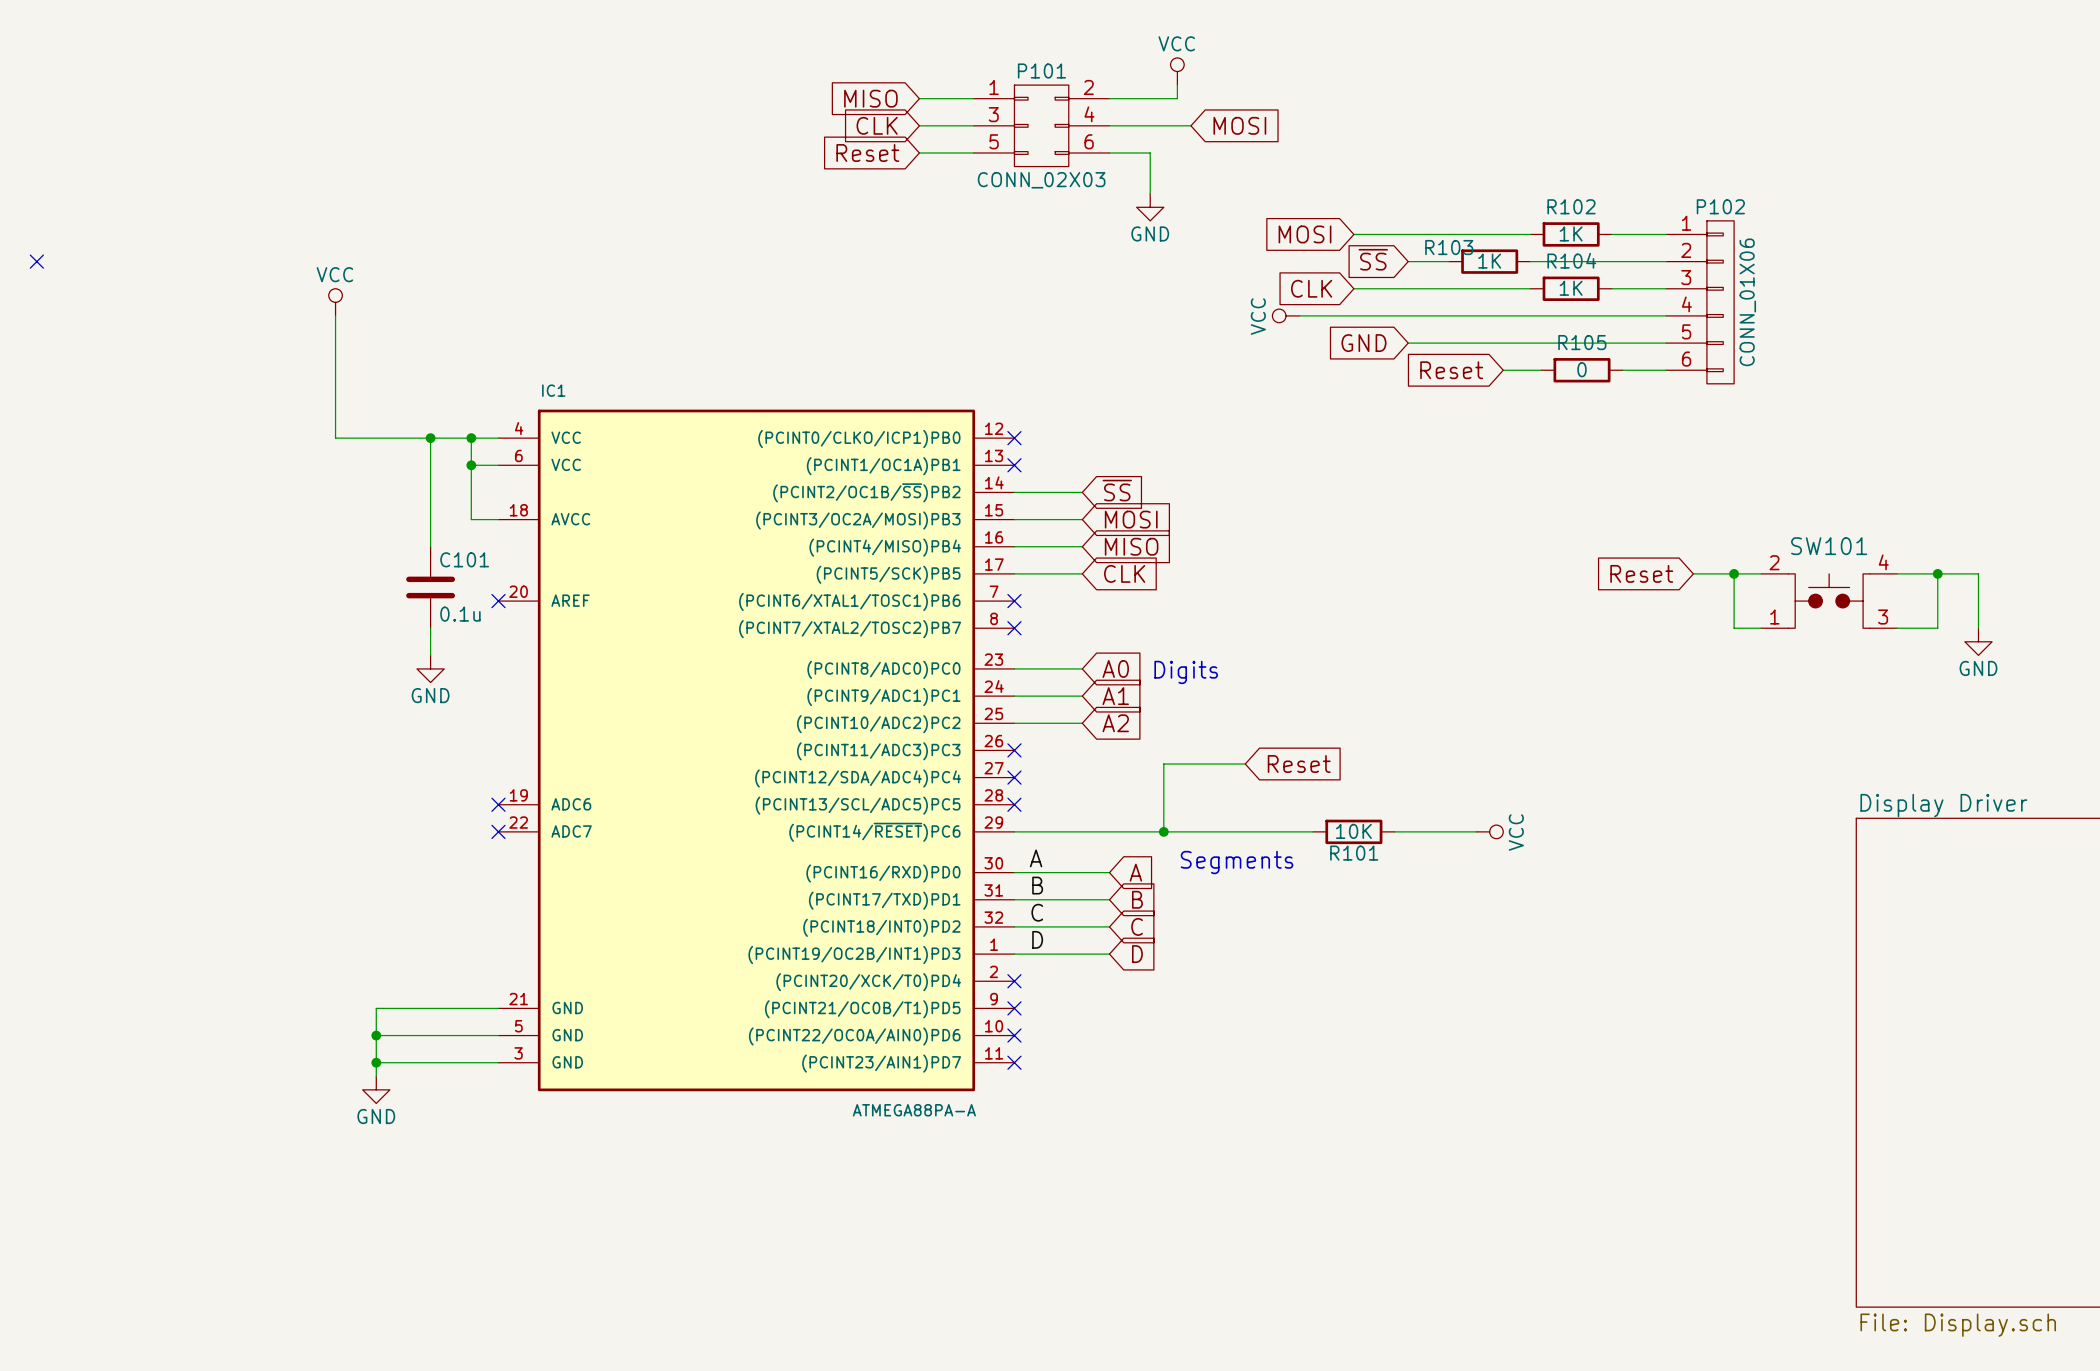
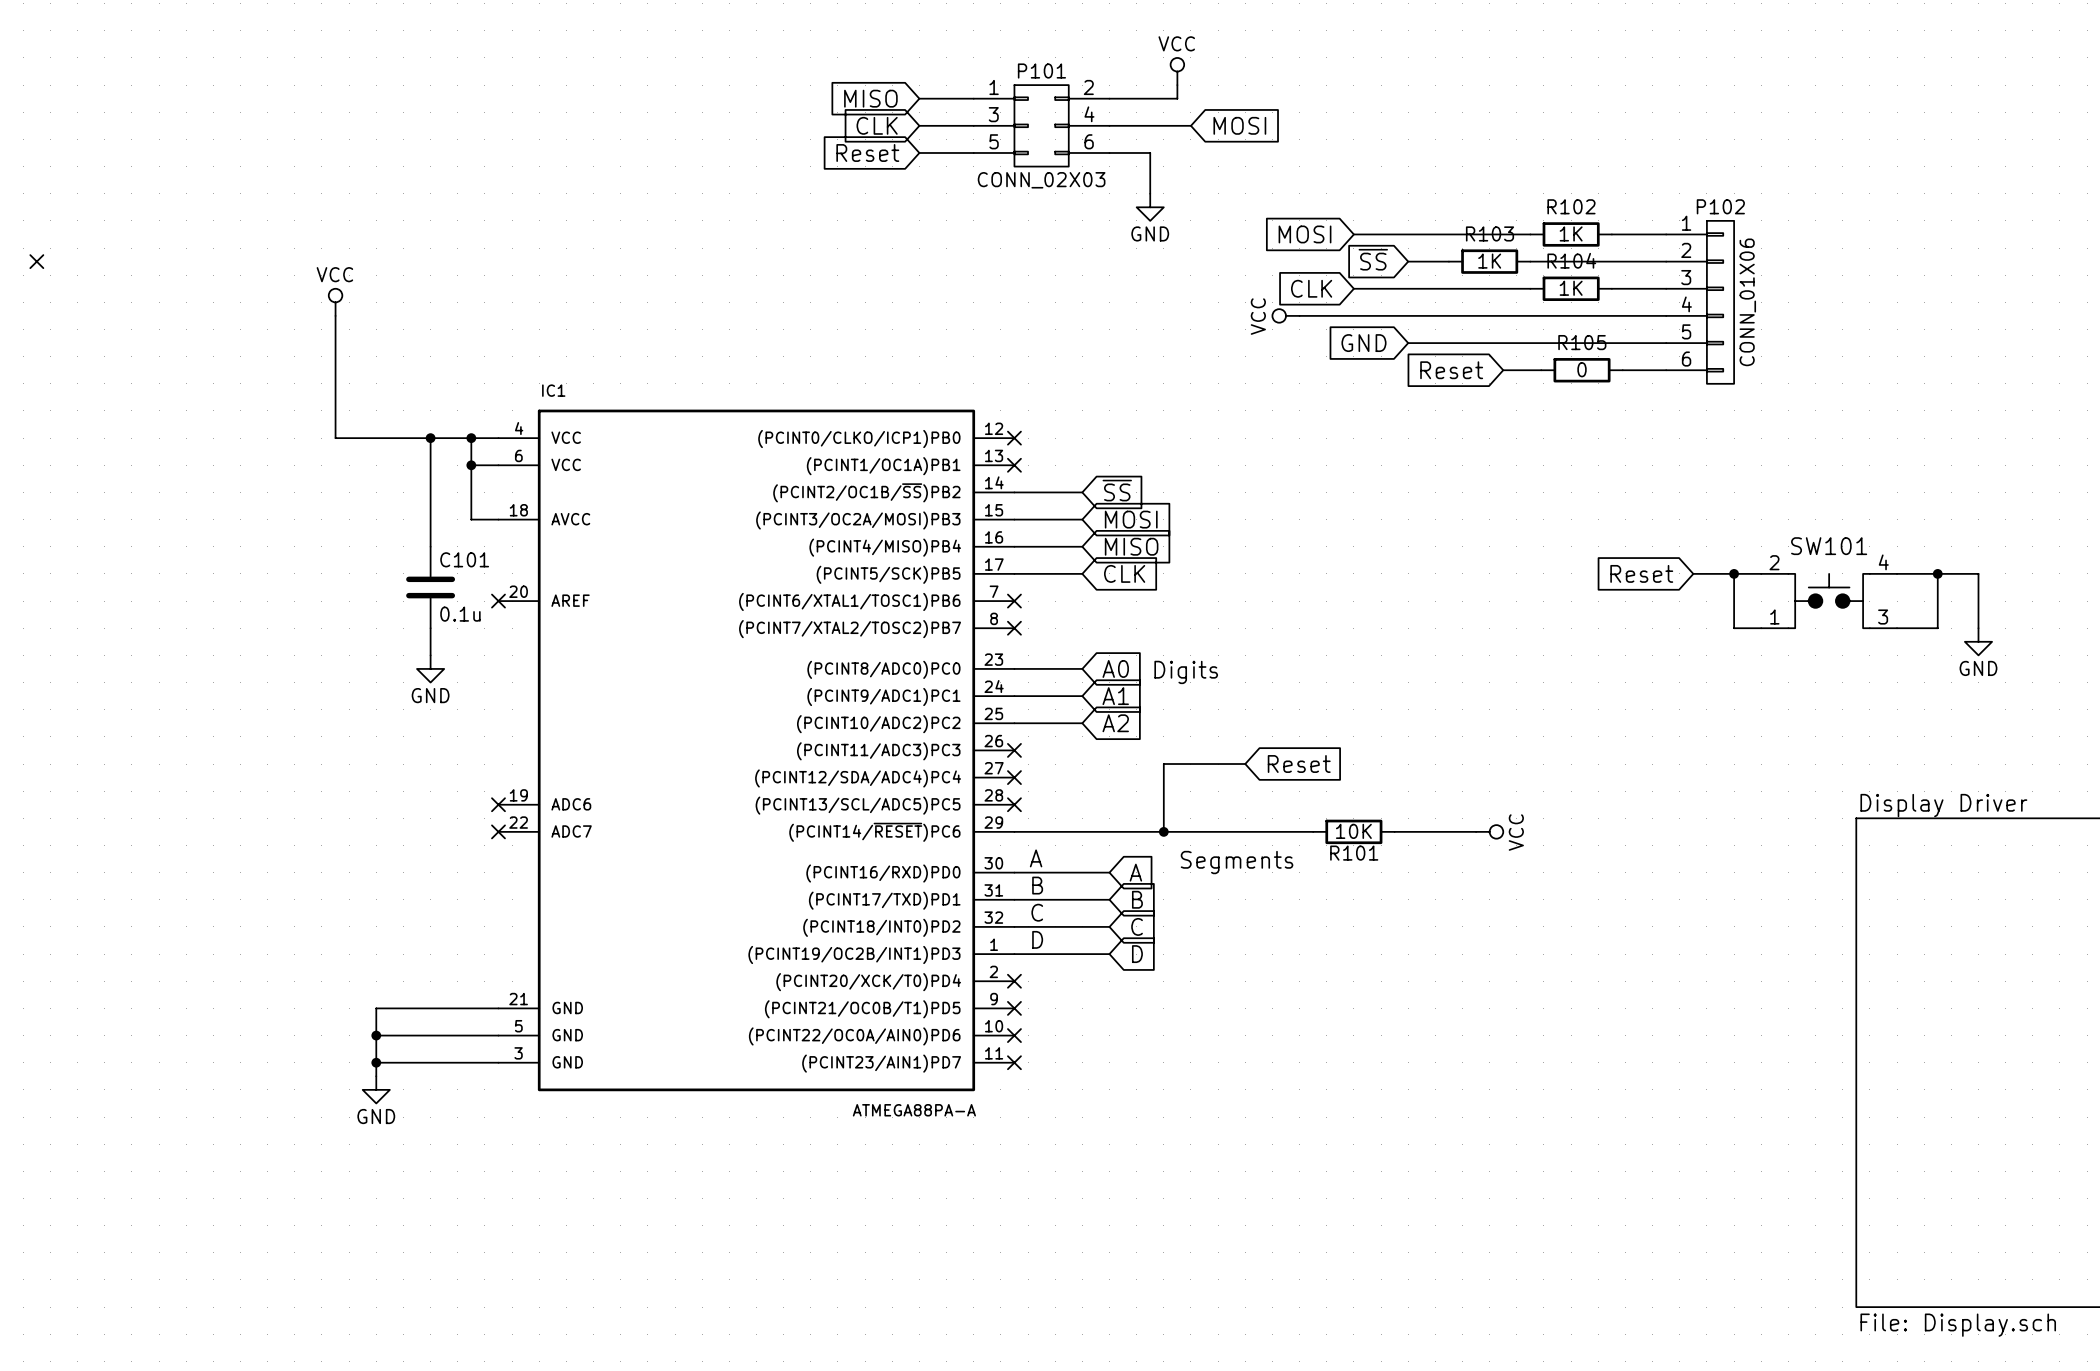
R103 name position: R103 (1449, 247) -> R103 (1490, 233)

